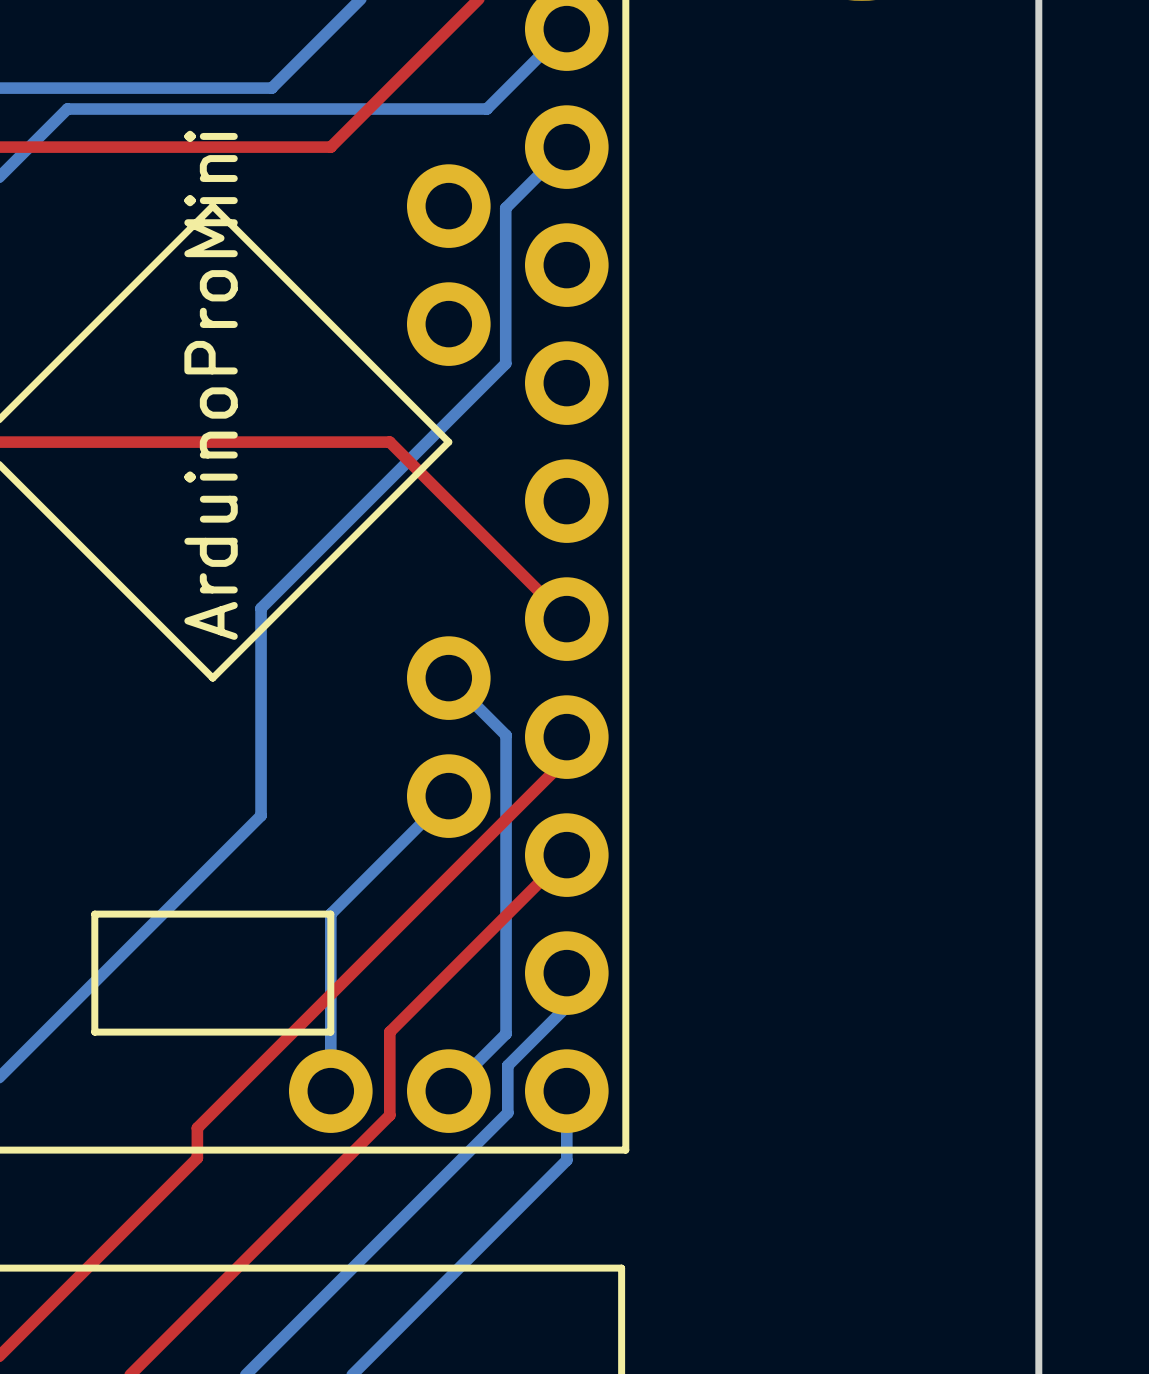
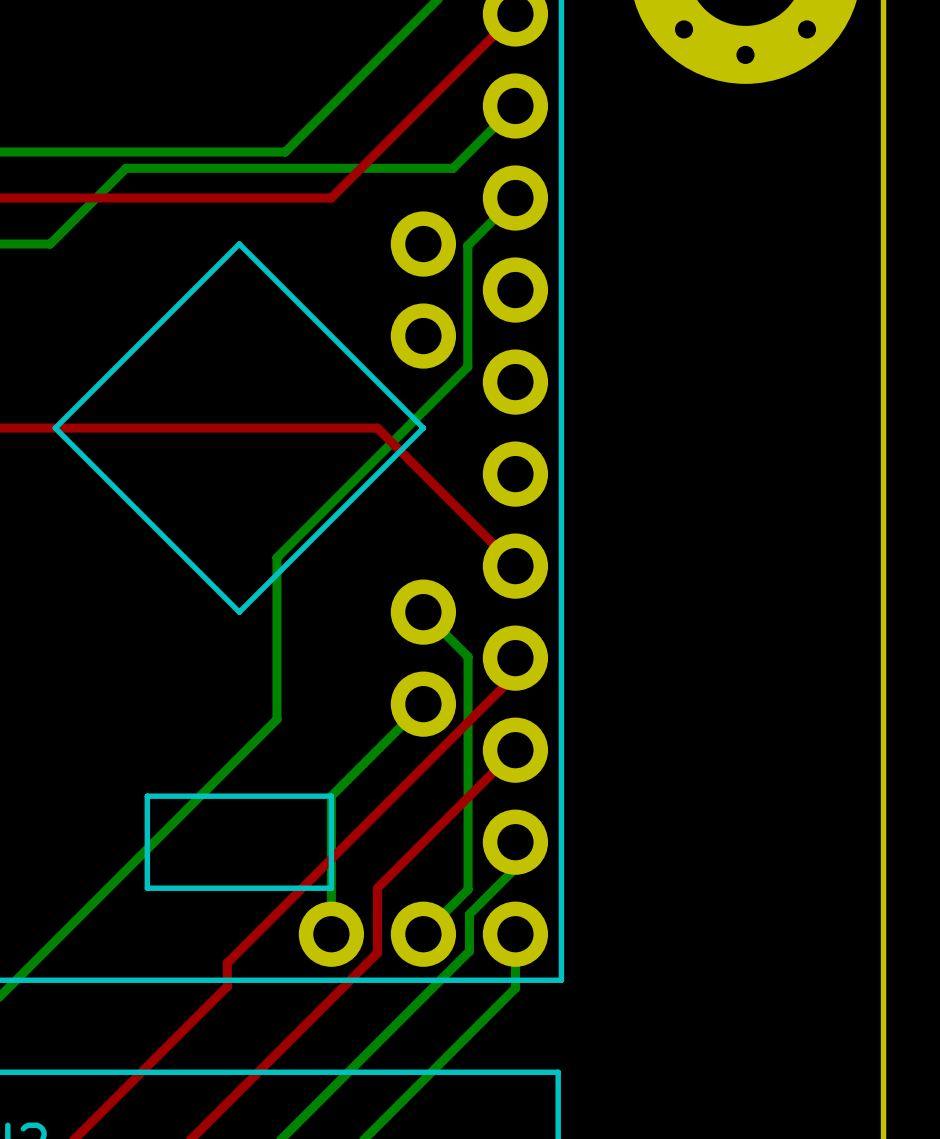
part value: ArduinoProMini (211, 385) -> none

